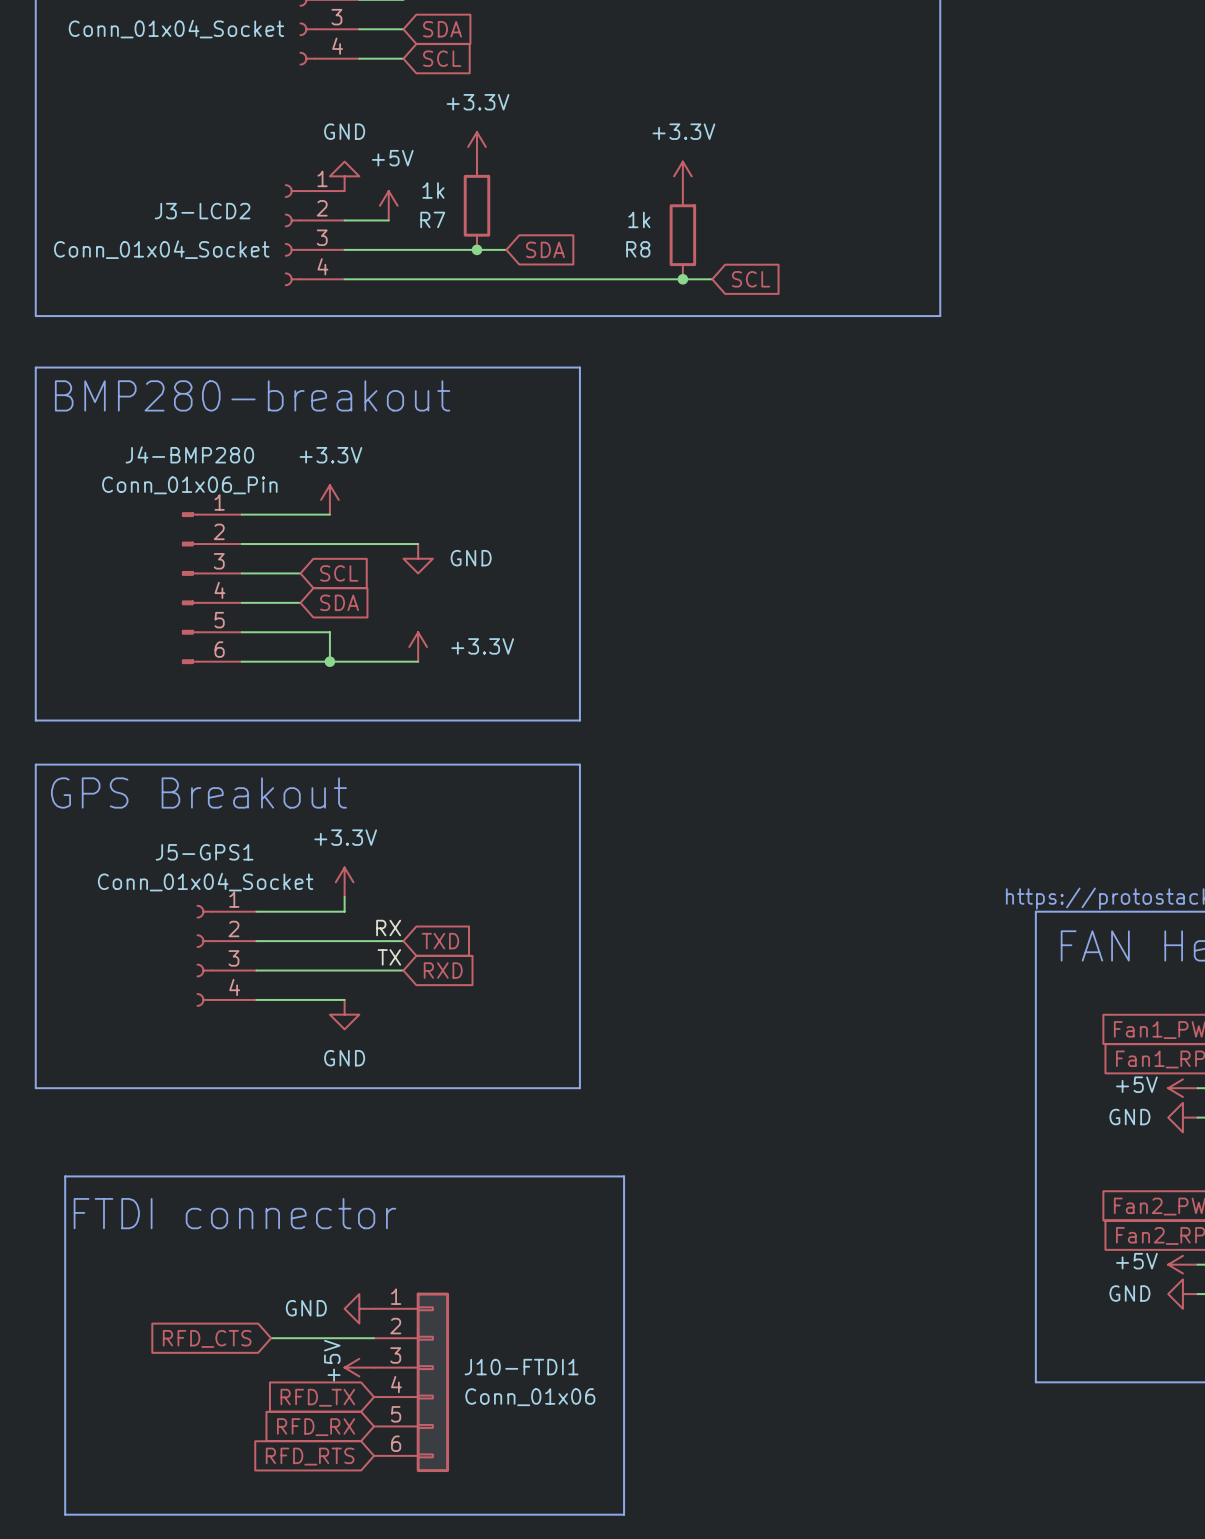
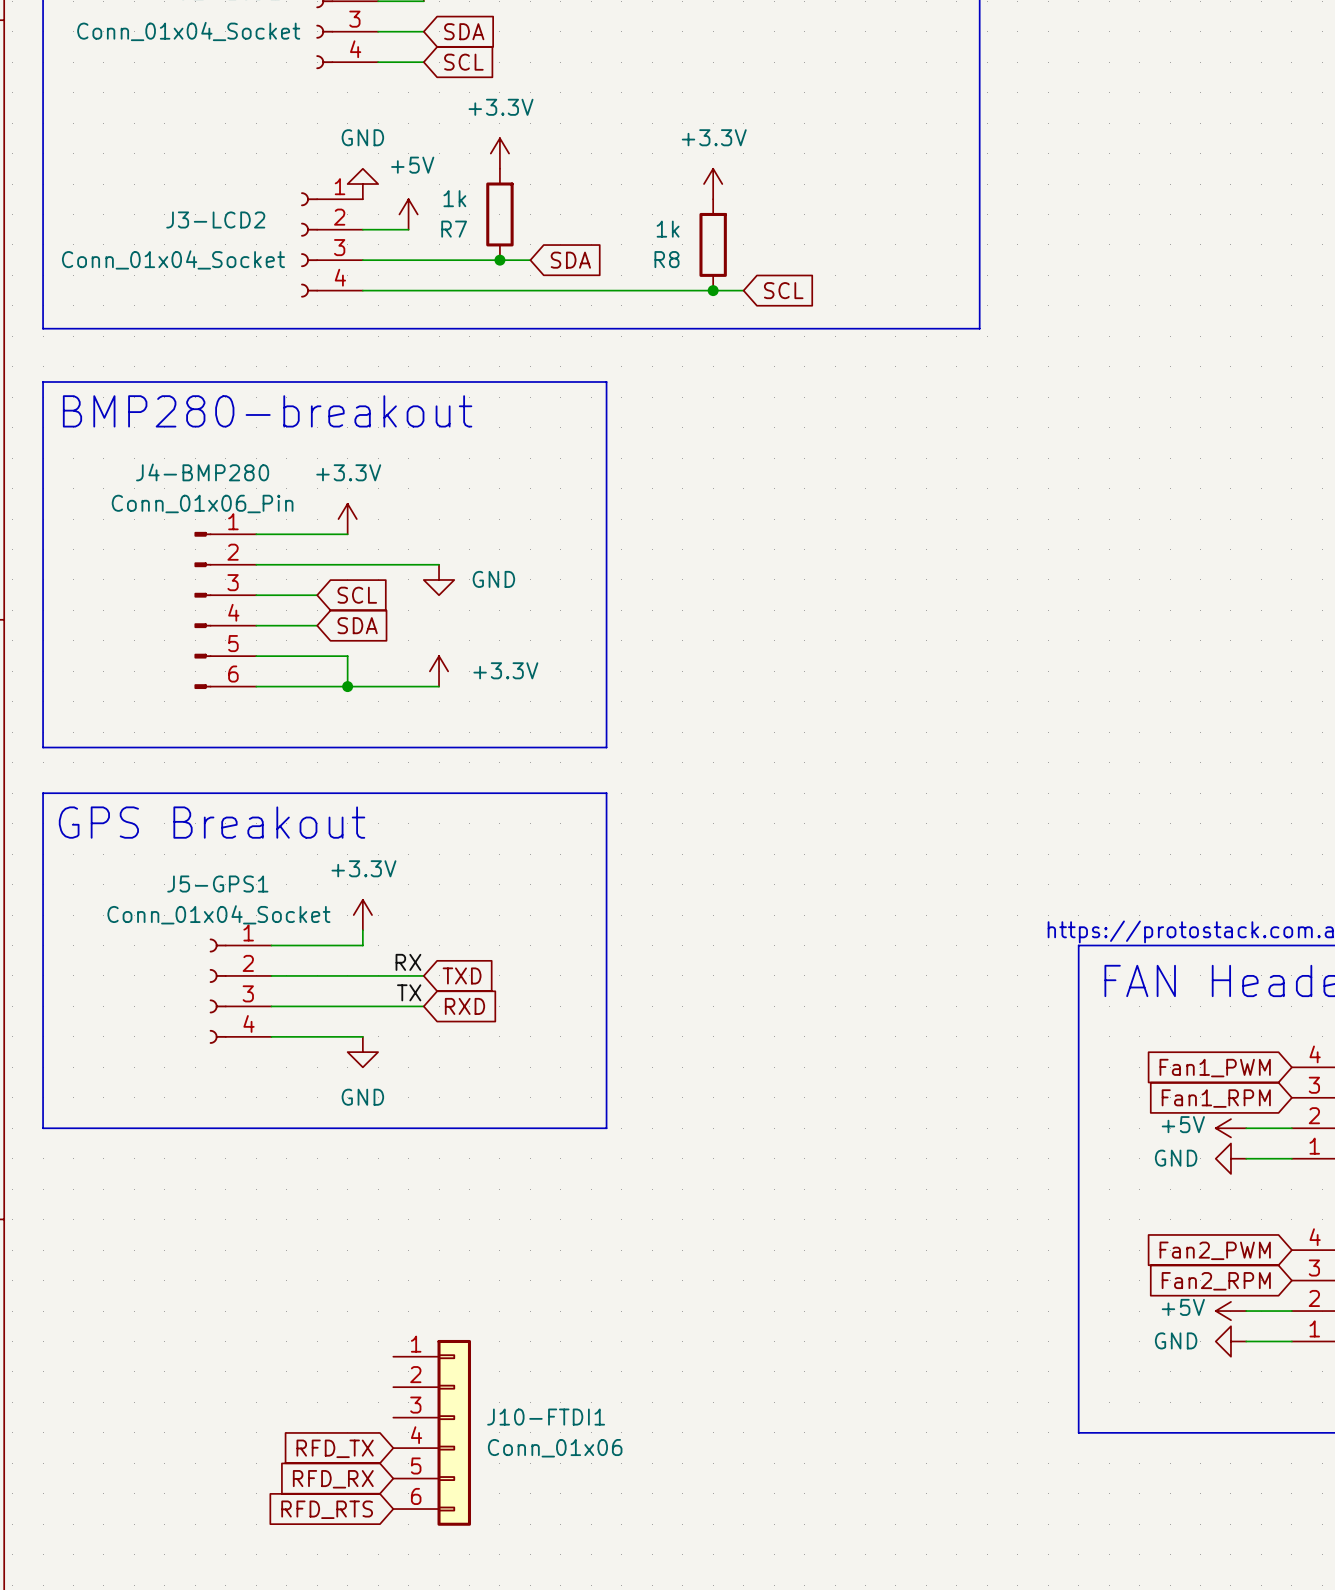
line: (65, 1176) (624, 1176) (624, 1514) (65, 1514) (65, 1176) -> none
text: FTDI connector (234, 1213) -> none
power symbol: GND (359, 1308) -> none
global label: RFD_CTS (207, 1338) -> none
wire: (271, 1338) (374, 1338) -> none
power symbol: +5V (359, 1367) -> none

